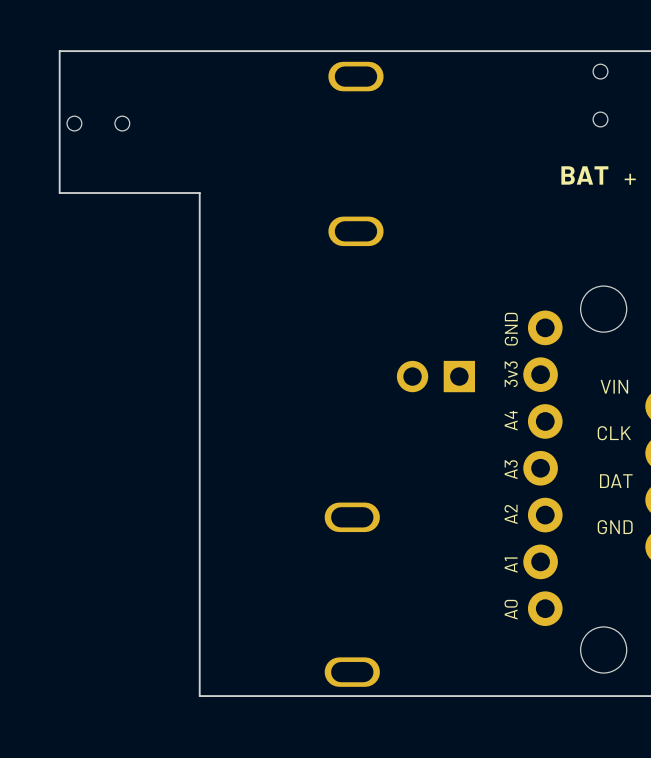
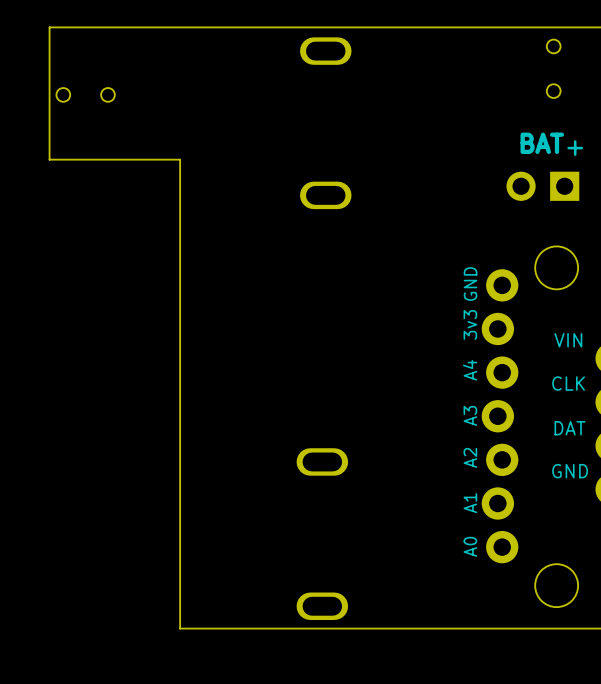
part position: (435, 376) -> (542, 186)

